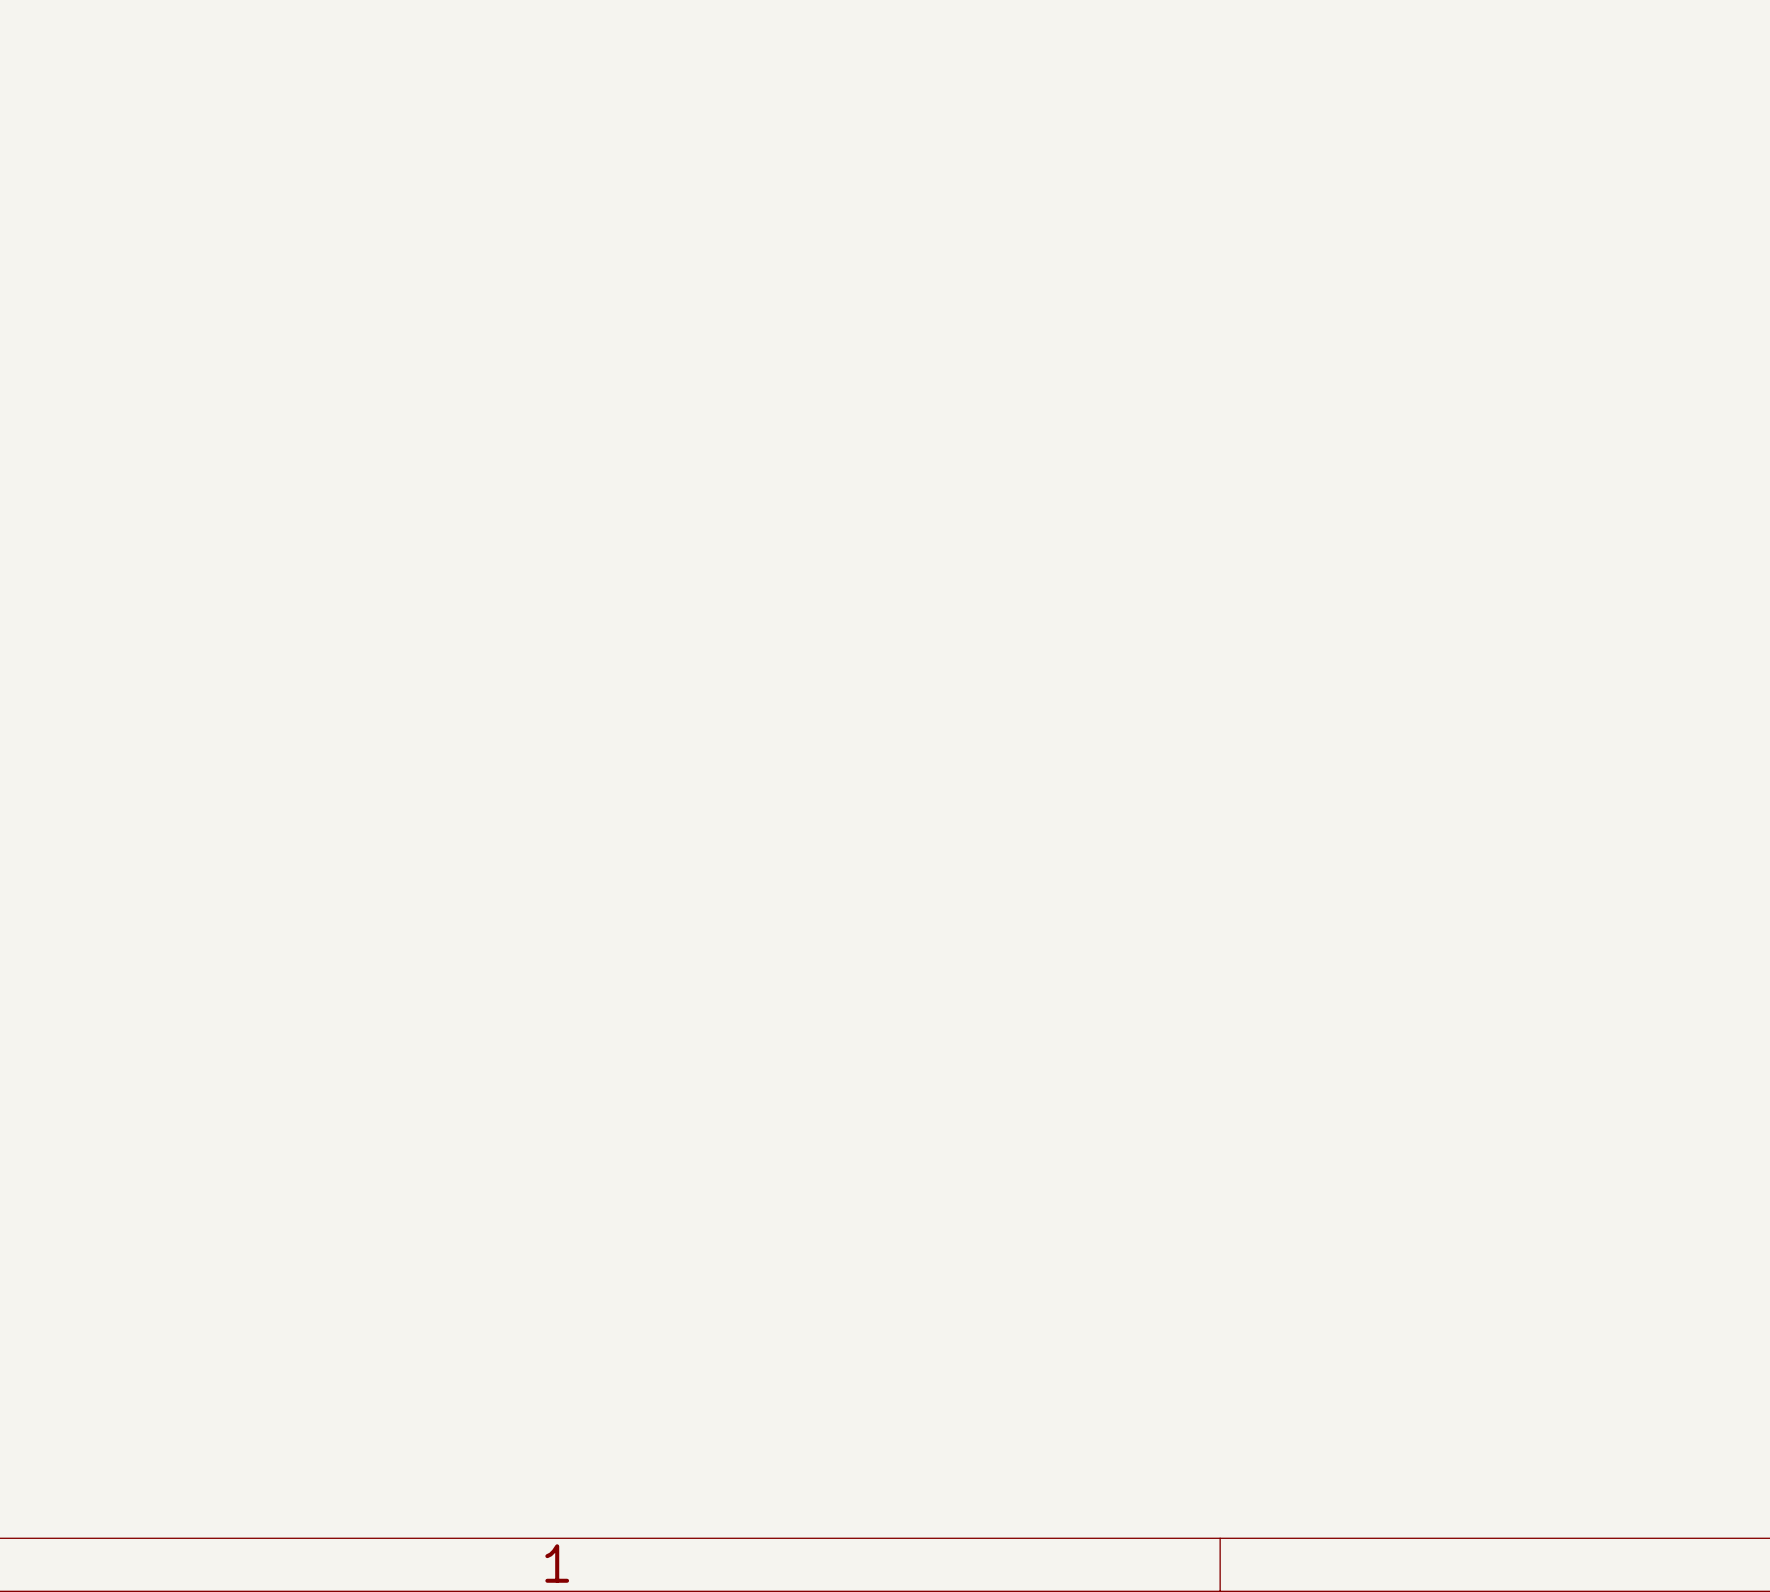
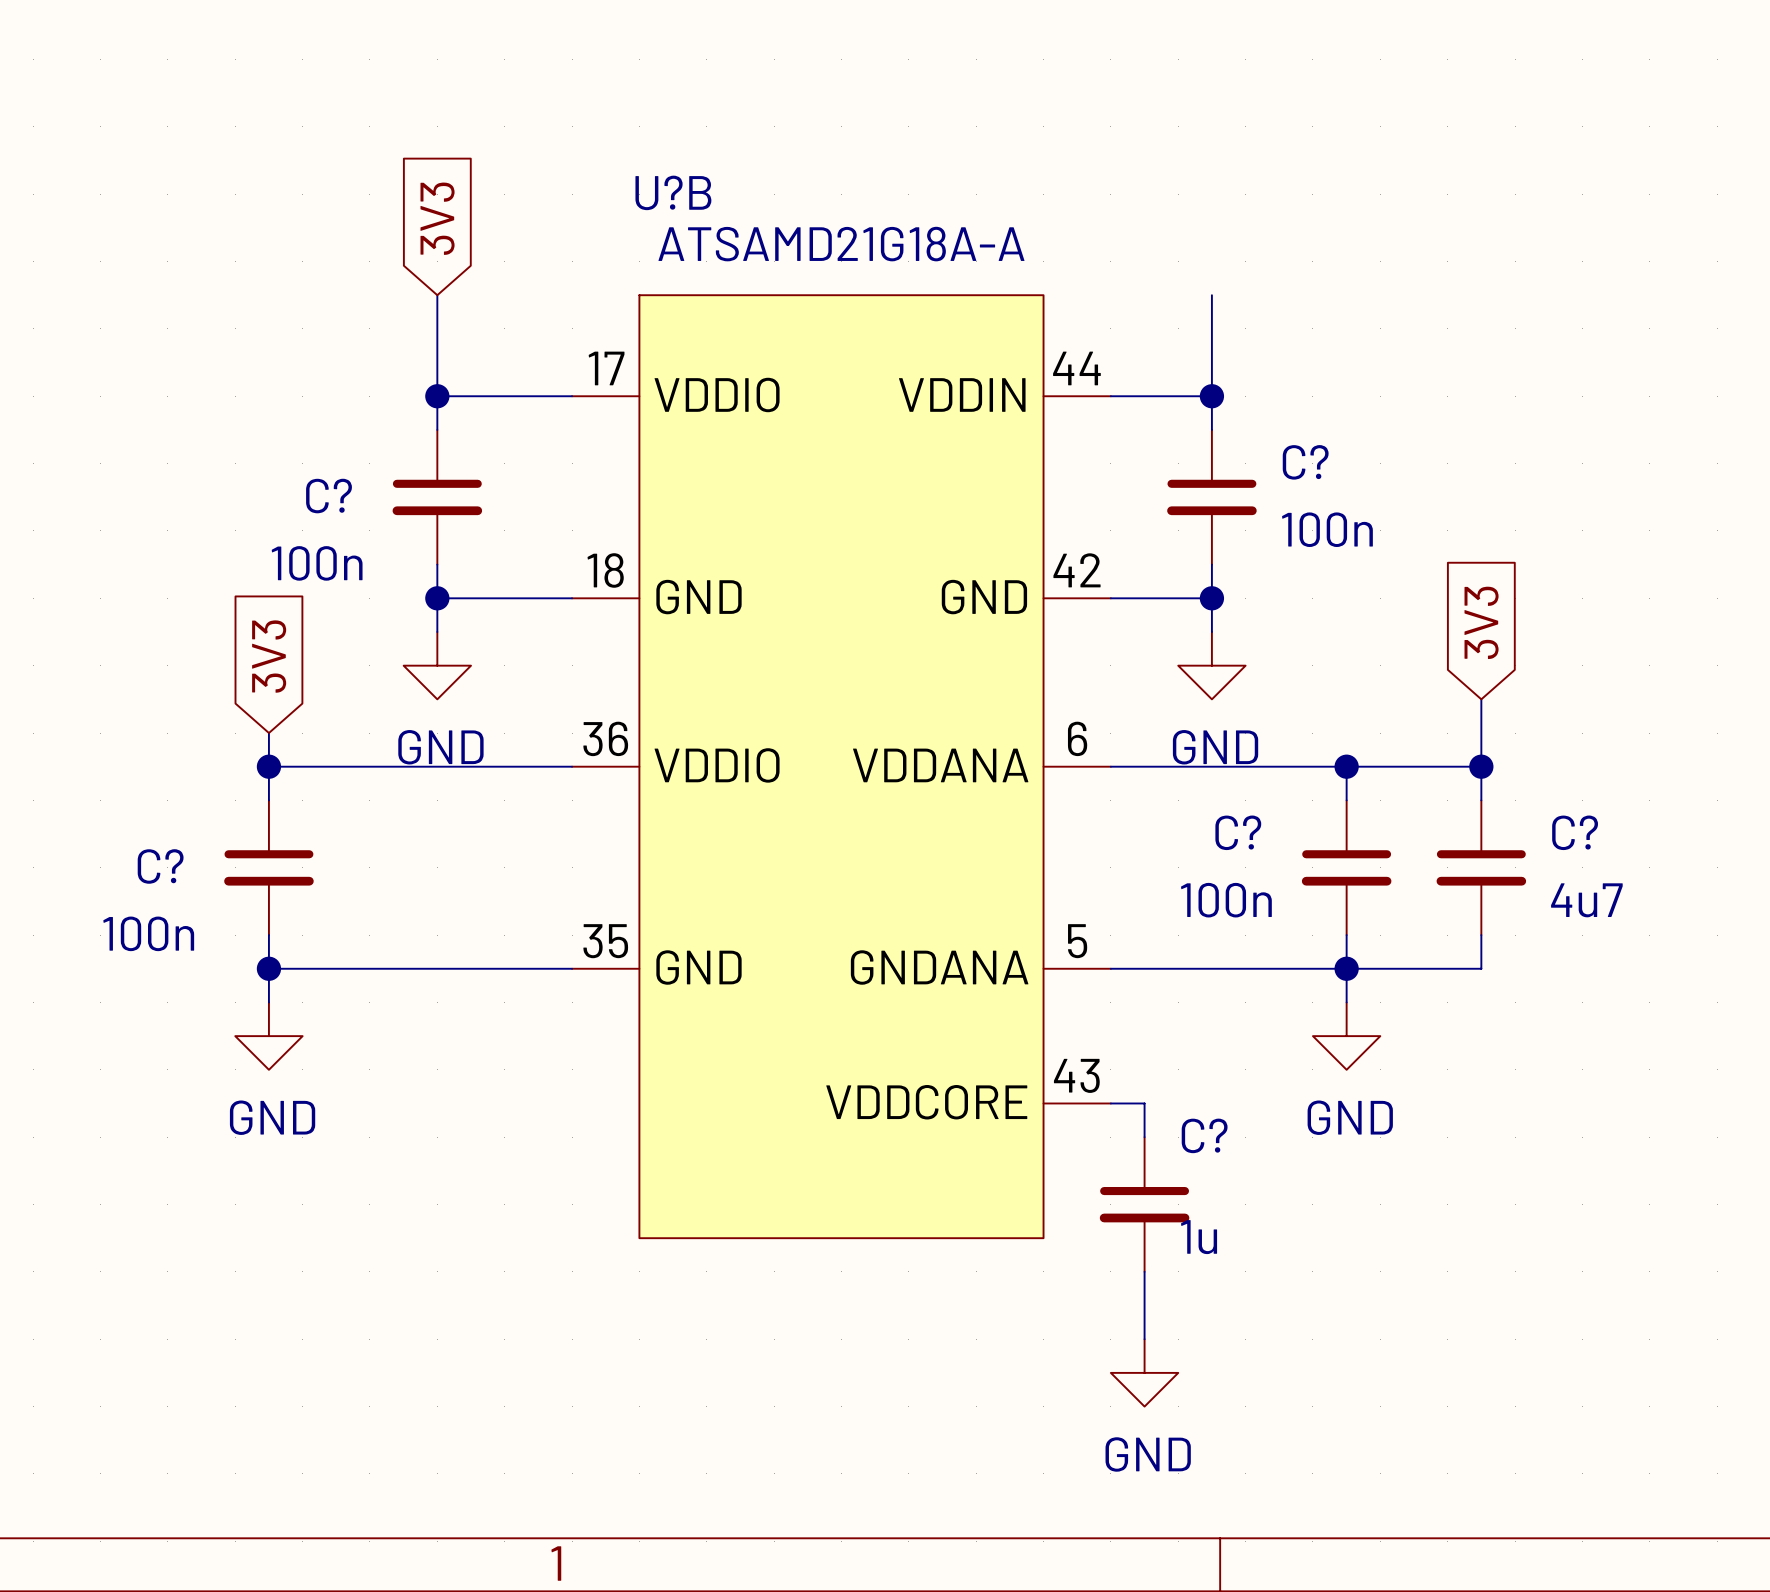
global label: none -> 3V3 (437, 218)
wire: none -> (437, 295) (437, 429)
wire: none -> (1211, 295) (1211, 429)
wire: none -> (437, 396) (572, 396)
junction: none -> (437, 396)
wire: none -> (1110, 396) (1211, 396)
junction: none -> (1211, 396)
C?: none -> 100n (437, 497)
C?: none -> 100n (1211, 497)
wire: none -> (437, 564) (437, 631)
wire: none -> (1211, 564) (1211, 631)
wire: none -> (437, 598) (572, 598)
junction: none -> (437, 598)
wire: none -> (1110, 598) (1211, 598)
junction: none -> (1211, 598)
global label: none -> 3V3 (1481, 622)
global label: none -> 3V3 (269, 656)
power symbol: none -> GND (437, 665)
power symbol: none -> GND (1211, 665)
wire: none -> (1481, 699) (1481, 800)
wire: none -> (268, 733) (268, 800)
wire: none -> (268, 766) (572, 766)
junction: none -> (268, 766)
U?B: none -> ATSAMD21G18A-A (841, 766)
wire: none -> (1110, 766) (1481, 766)
wire: none -> (1346, 766) (1346, 800)
junction: none -> (1346, 766)
junction: none -> (1481, 766)
C?: none -> 100n (268, 867)
C?: none -> 100n (1346, 867)
C?: none -> 4u7 (1481, 867)
wire: none -> (268, 935) (268, 1002)
wire: none -> (1346, 935) (1346, 1002)
wire: none -> (1481, 935) (1481, 968) (1110, 968)
wire: none -> (268, 968) (572, 968)
junction: none -> (268, 968)
junction: none -> (1346, 968)
power symbol: none -> GND (268, 1036)
power symbol: none -> GND (1346, 1036)
wire: none -> (1110, 1103) (1144, 1103) (1144, 1137)
C?: none -> 1u (1144, 1204)
wire: none -> (1144, 1271) (1144, 1339)
power symbol: none -> GND (1144, 1372)

